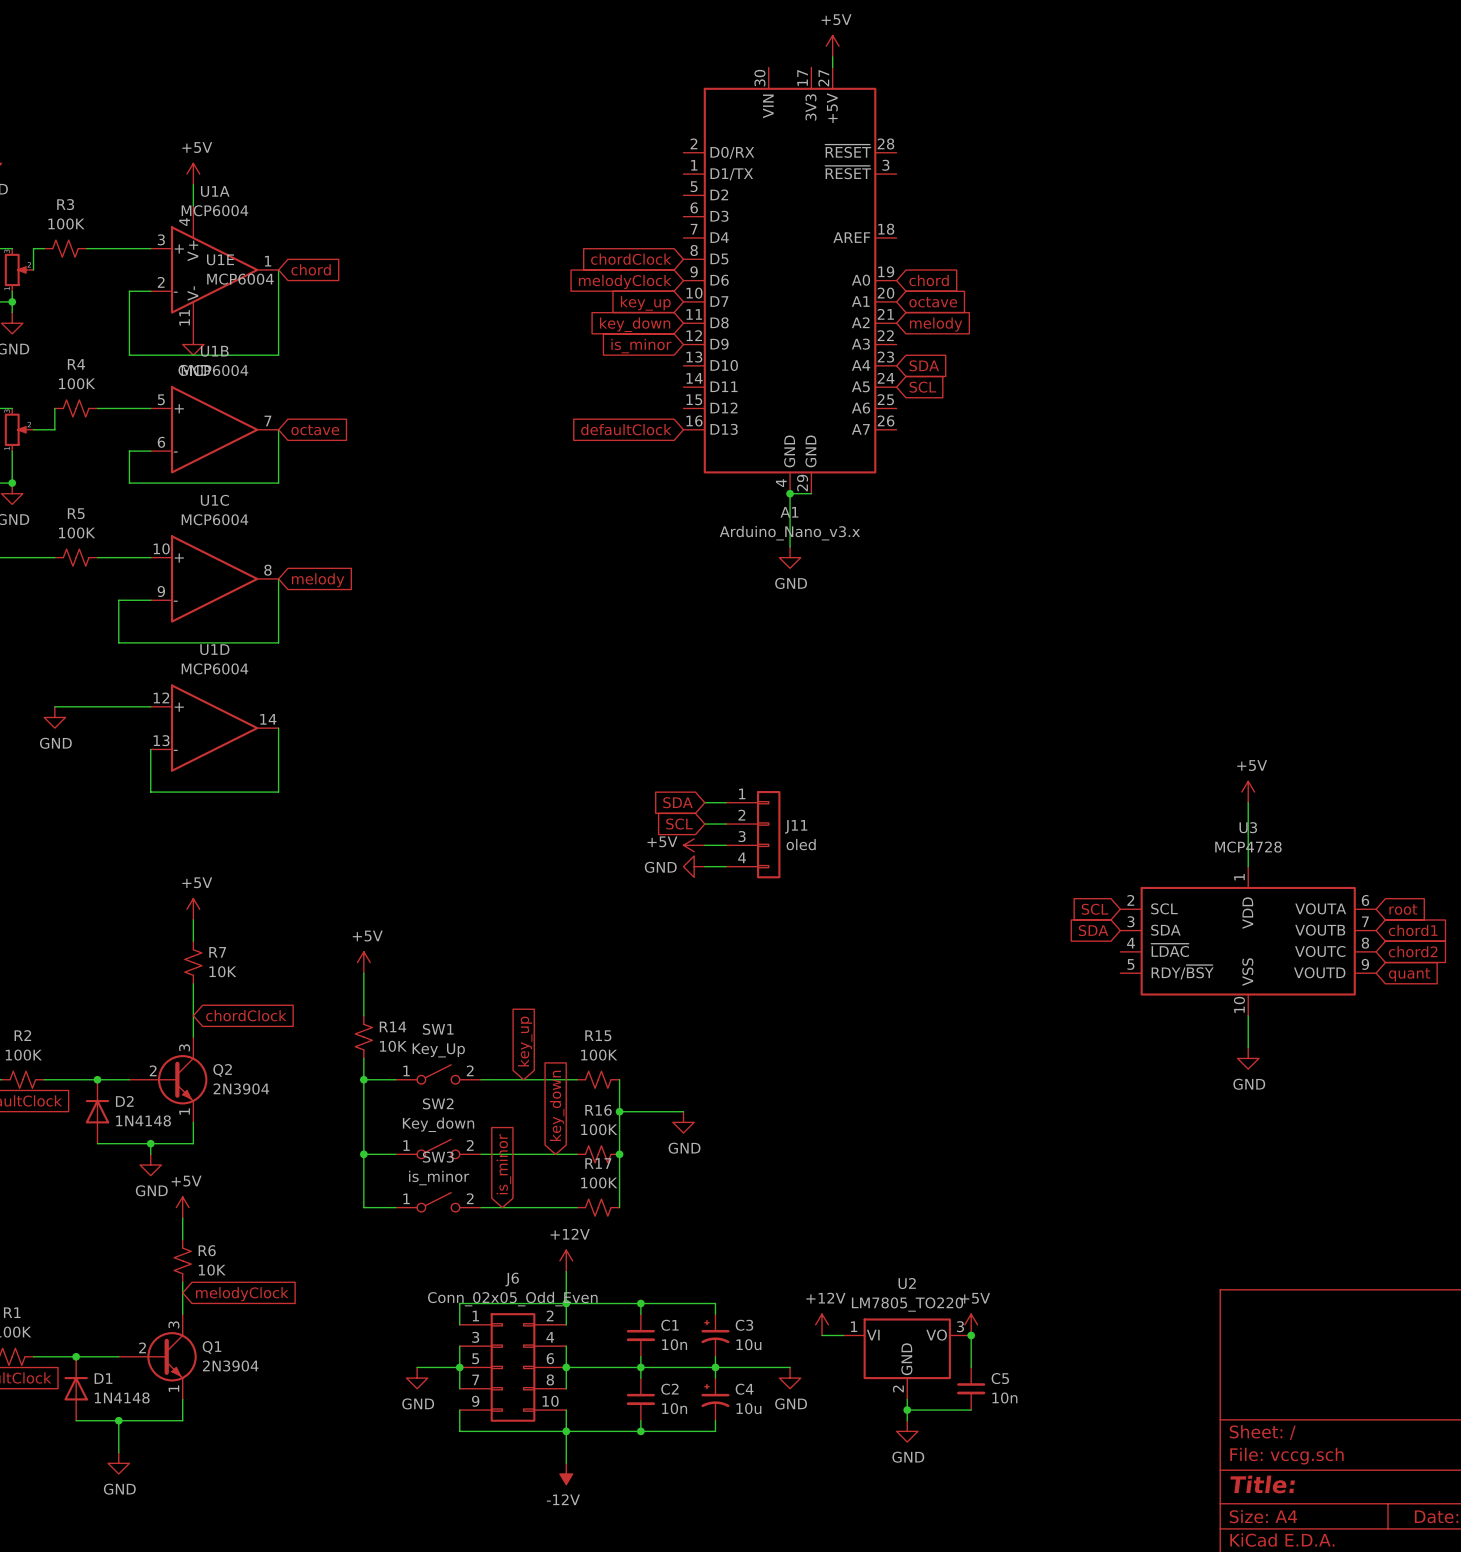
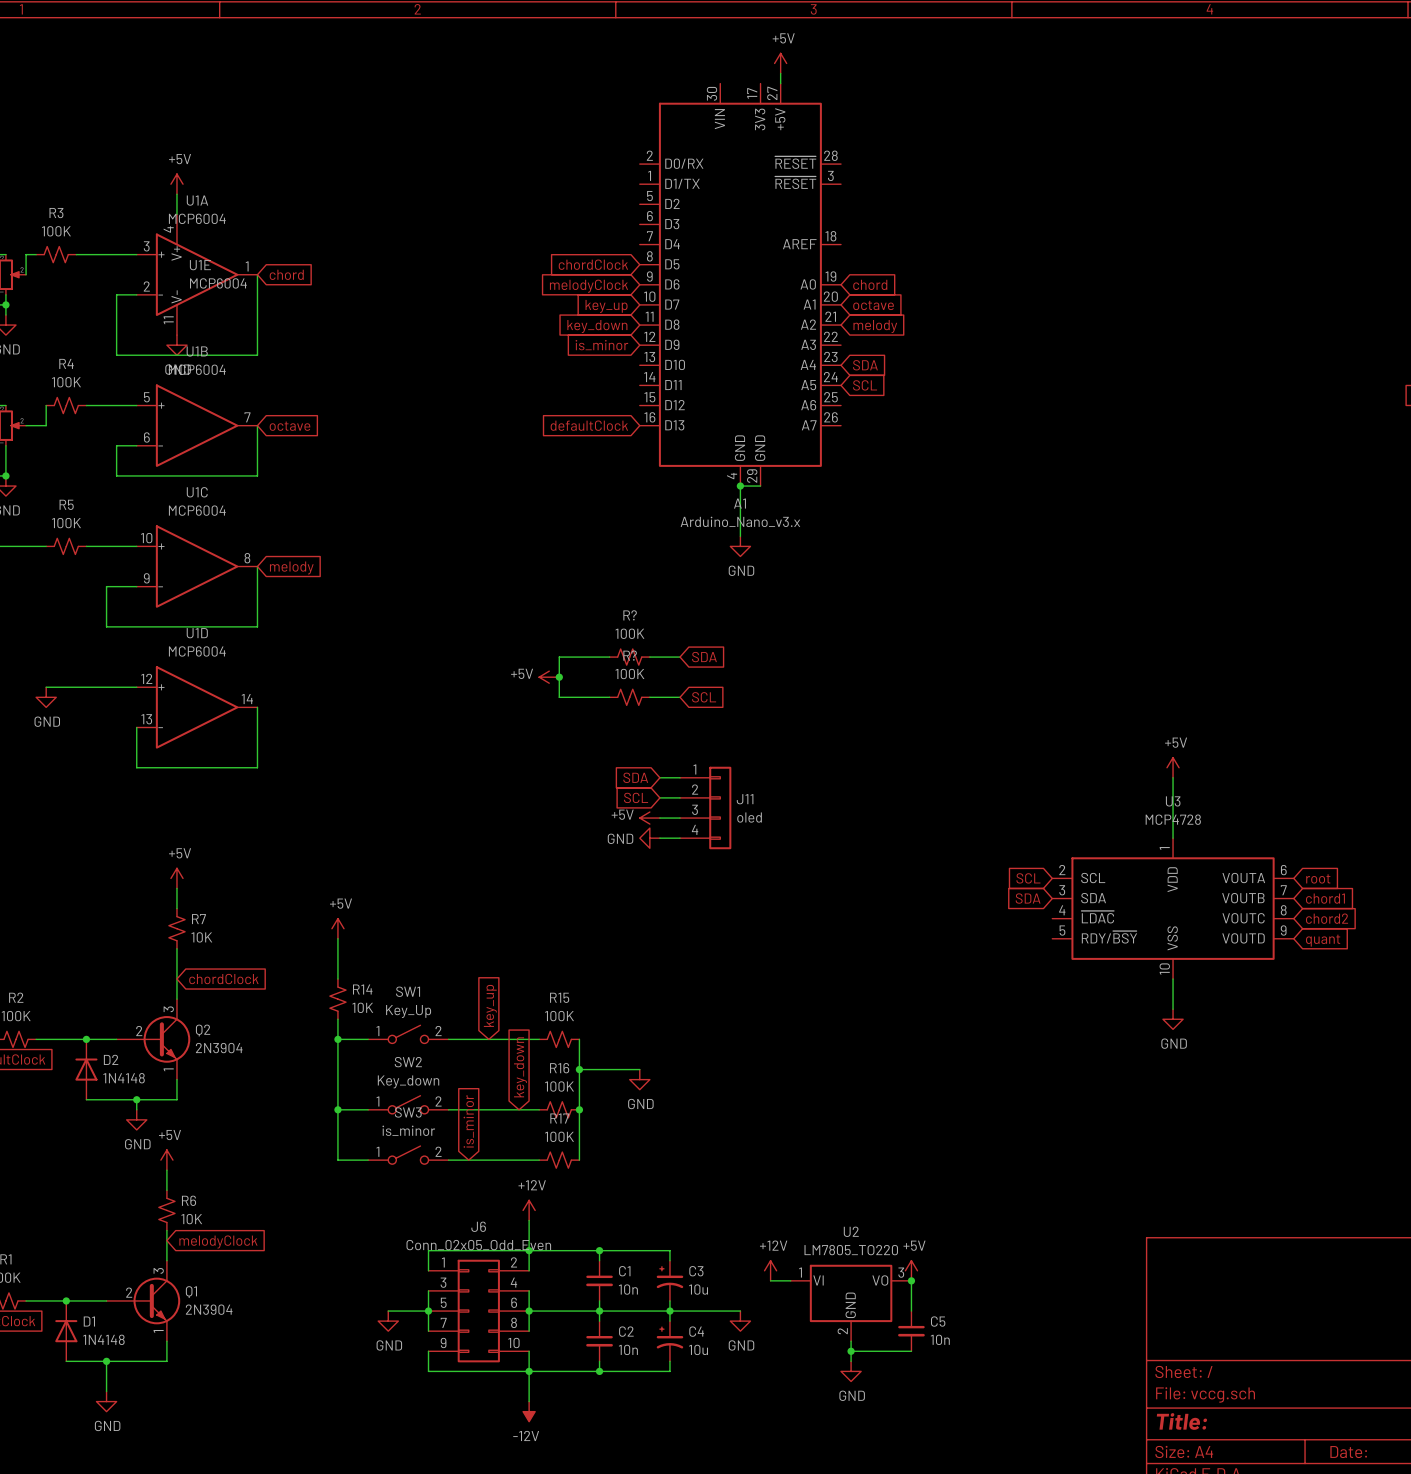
wire: none -> (609, 657) (559, 657) (559, 697) (609, 697)
R?: none -> 100K (629, 657)
wire: none -> (649, 657) (680, 657)
global label: none -> SDA (704, 657)
power symbol: none -> +5V (549, 677)
junction: none -> (559, 677)
R?: none -> 100K (629, 697)
wire: none -> (649, 697) (680, 697)
global label: none -> SCL (704, 697)

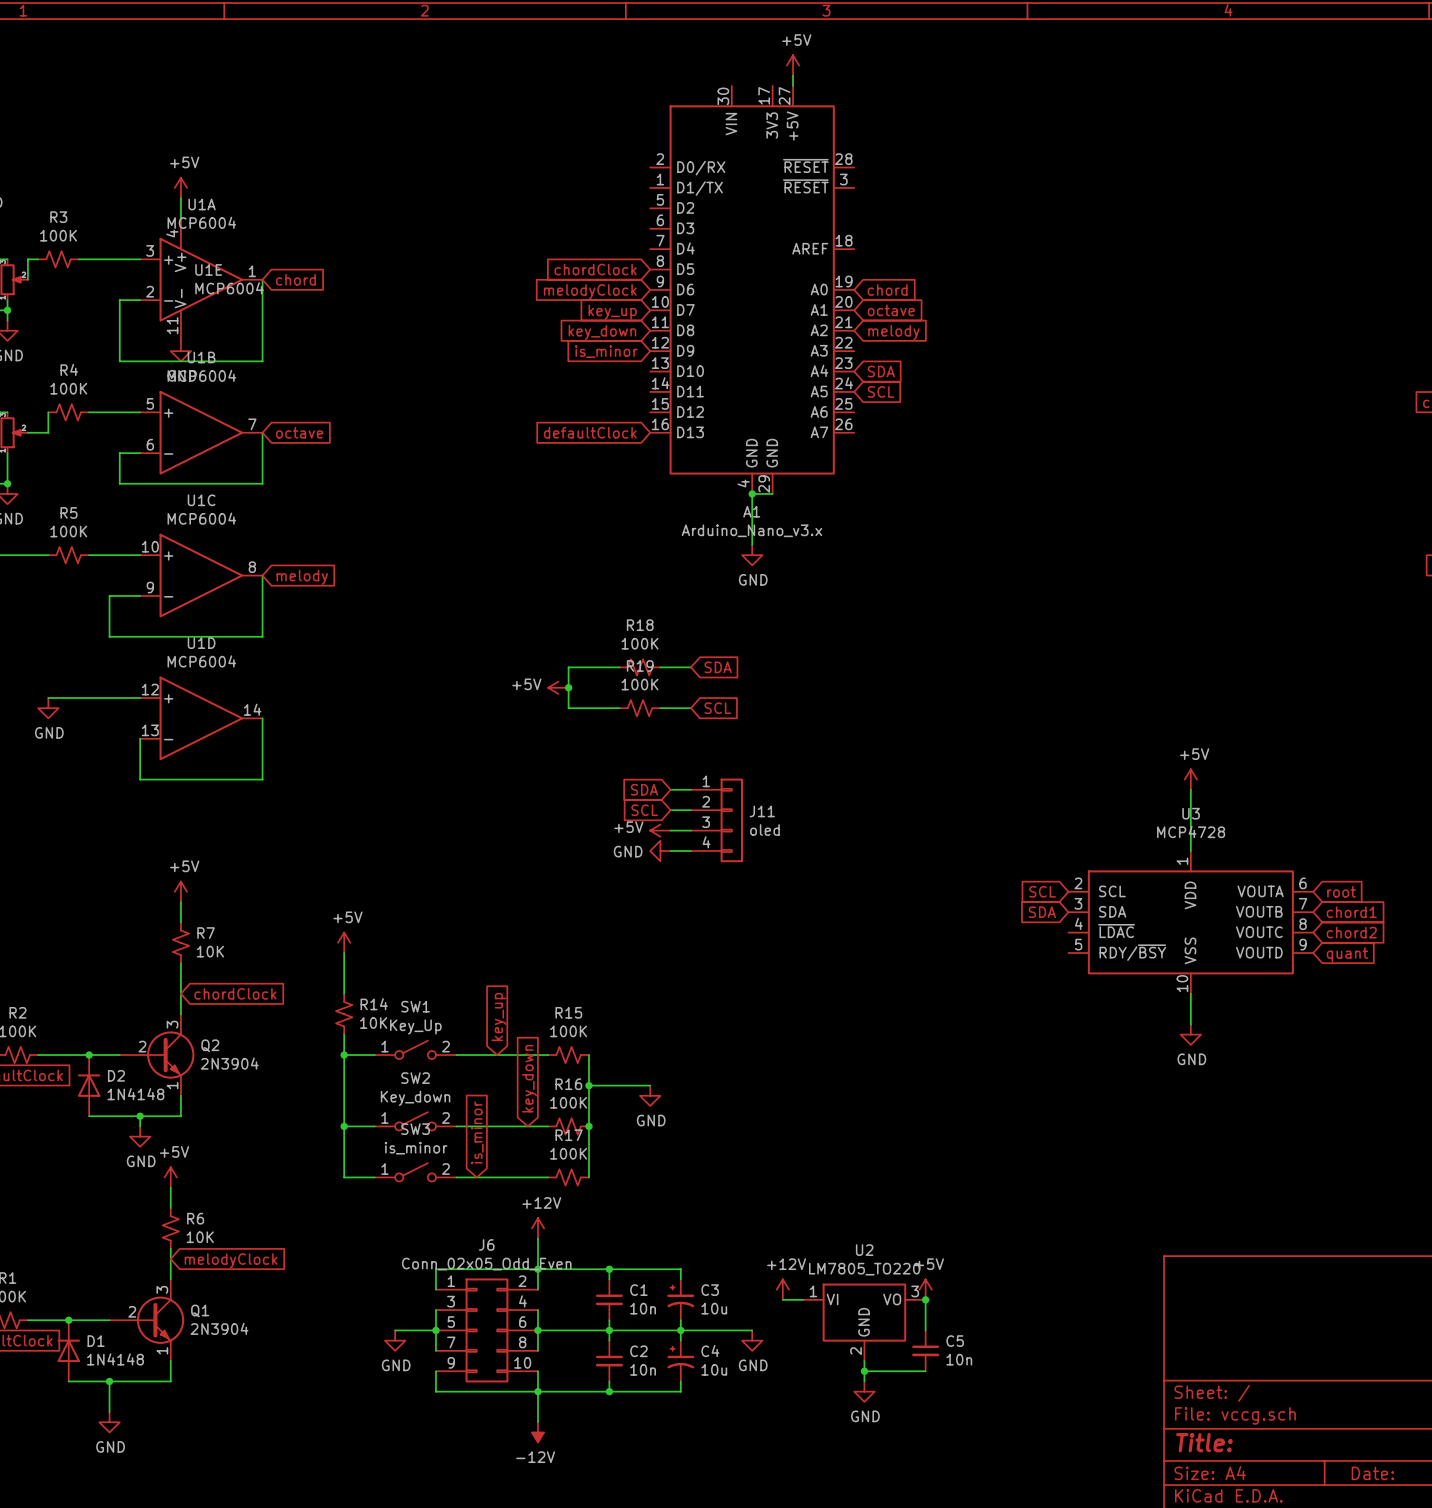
R? name: R? (630, 615) -> R18 (640, 625)
R? name: R? (630, 655) -> R19 (640, 665)

